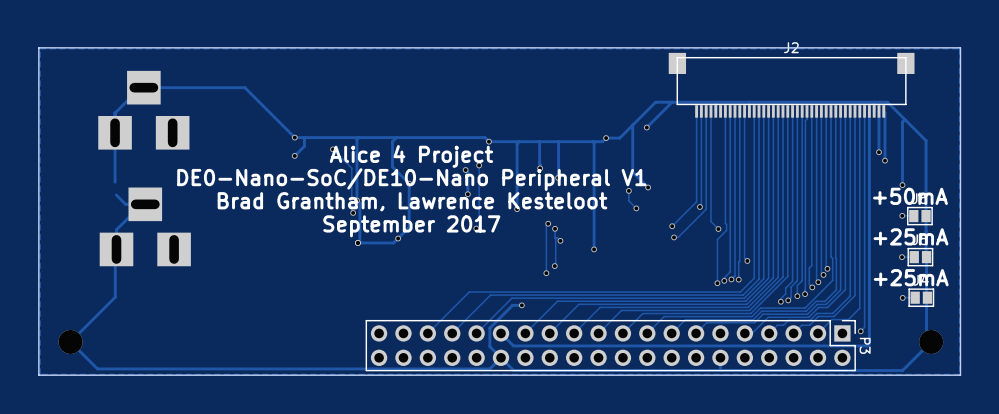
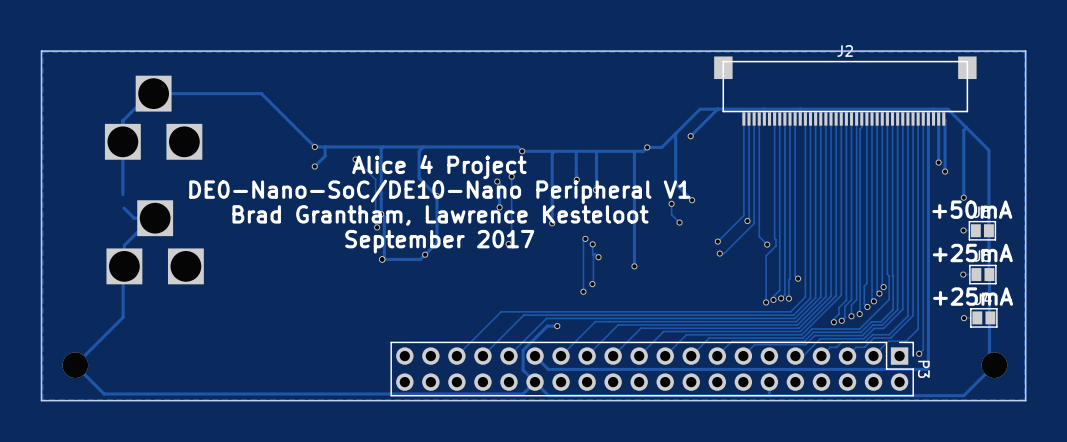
part footprint: [98, 70, 190, 150] -> [104, 75, 203, 160]
part footprint: [99, 187, 191, 267] -> [106, 200, 204, 285]

